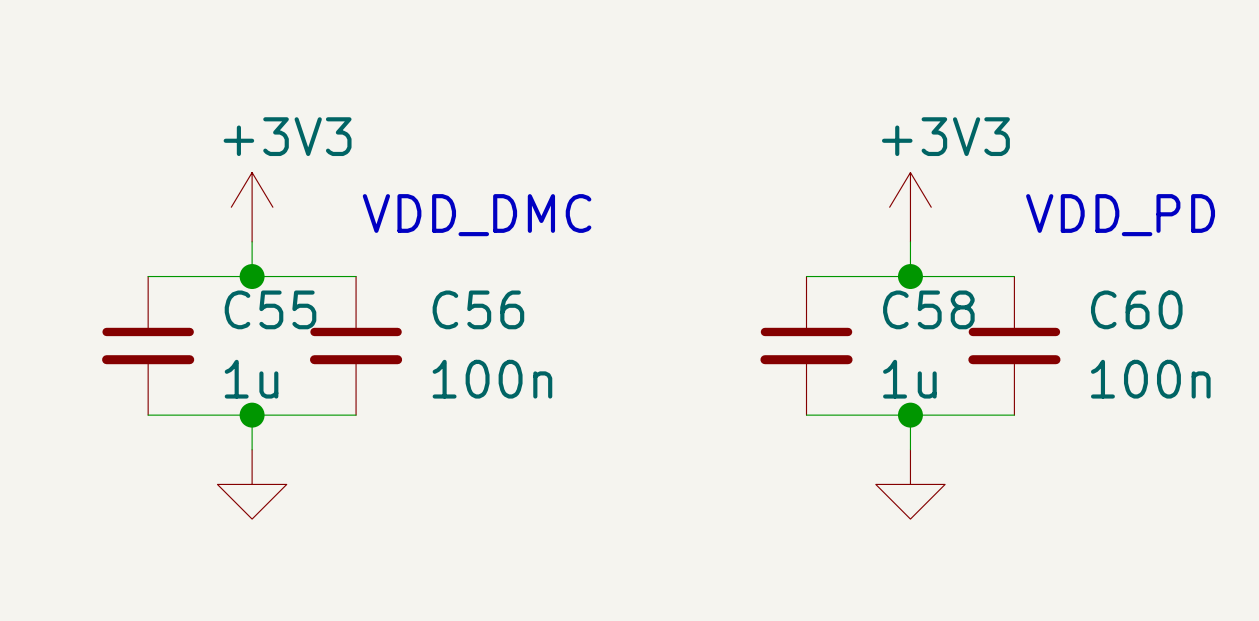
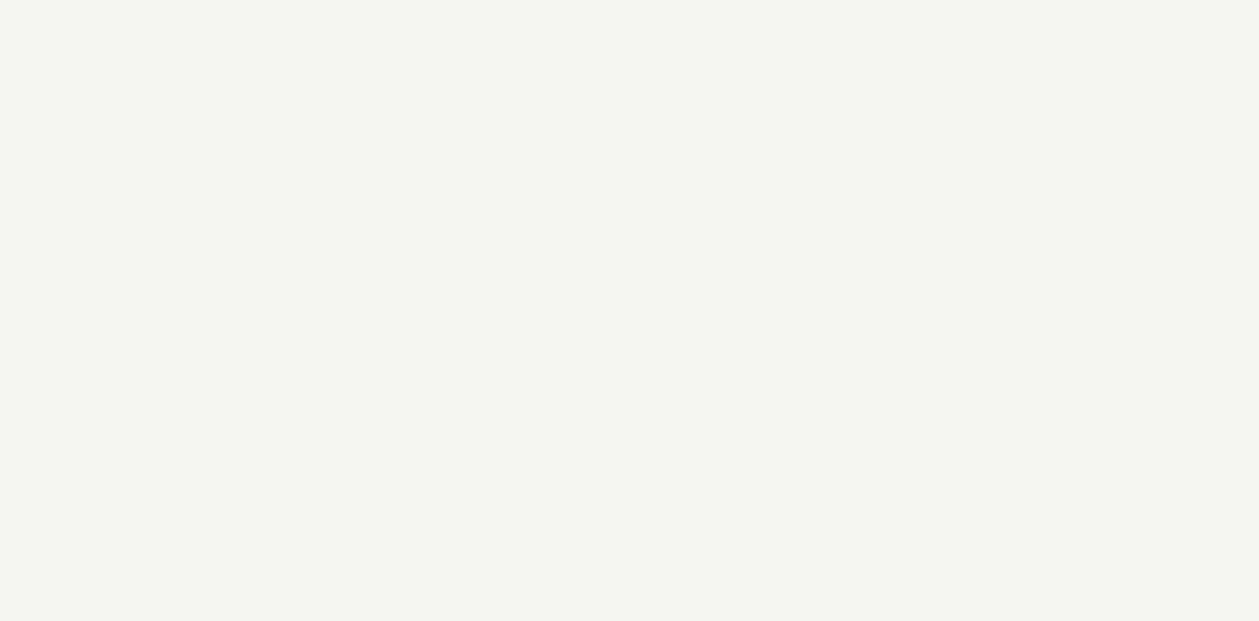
power symbol: +3V3 (252, 207) -> none
power symbol: +3V3 (910, 207) -> none
text: VDD_DMC (477, 215) -> none
text: VDD_PD (1120, 215) -> none
wire: (252, 241) (252, 276) -> none
wire: (910, 241) (910, 276) -> none
wire: (148, 276) (356, 276) -> none
junction: (252, 276) -> none
wire: (806, 276) (1014, 276) -> none
junction: (910, 276) -> none
C55: 1u (148, 345) -> none
C56: 100n (356, 345) -> none
C58: 1u (806, 345) -> none
C60: 100n (1014, 345) -> none
wire: (148, 415) (356, 415) -> none
wire: (252, 415) (252, 449) -> none
junction: (252, 415) -> none
wire: (806, 415) (1014, 415) -> none
wire: (910, 415) (910, 449) -> none
junction: (910, 415) -> none
power symbol: (252, 484) -> none
power symbol: (910, 484) -> none

